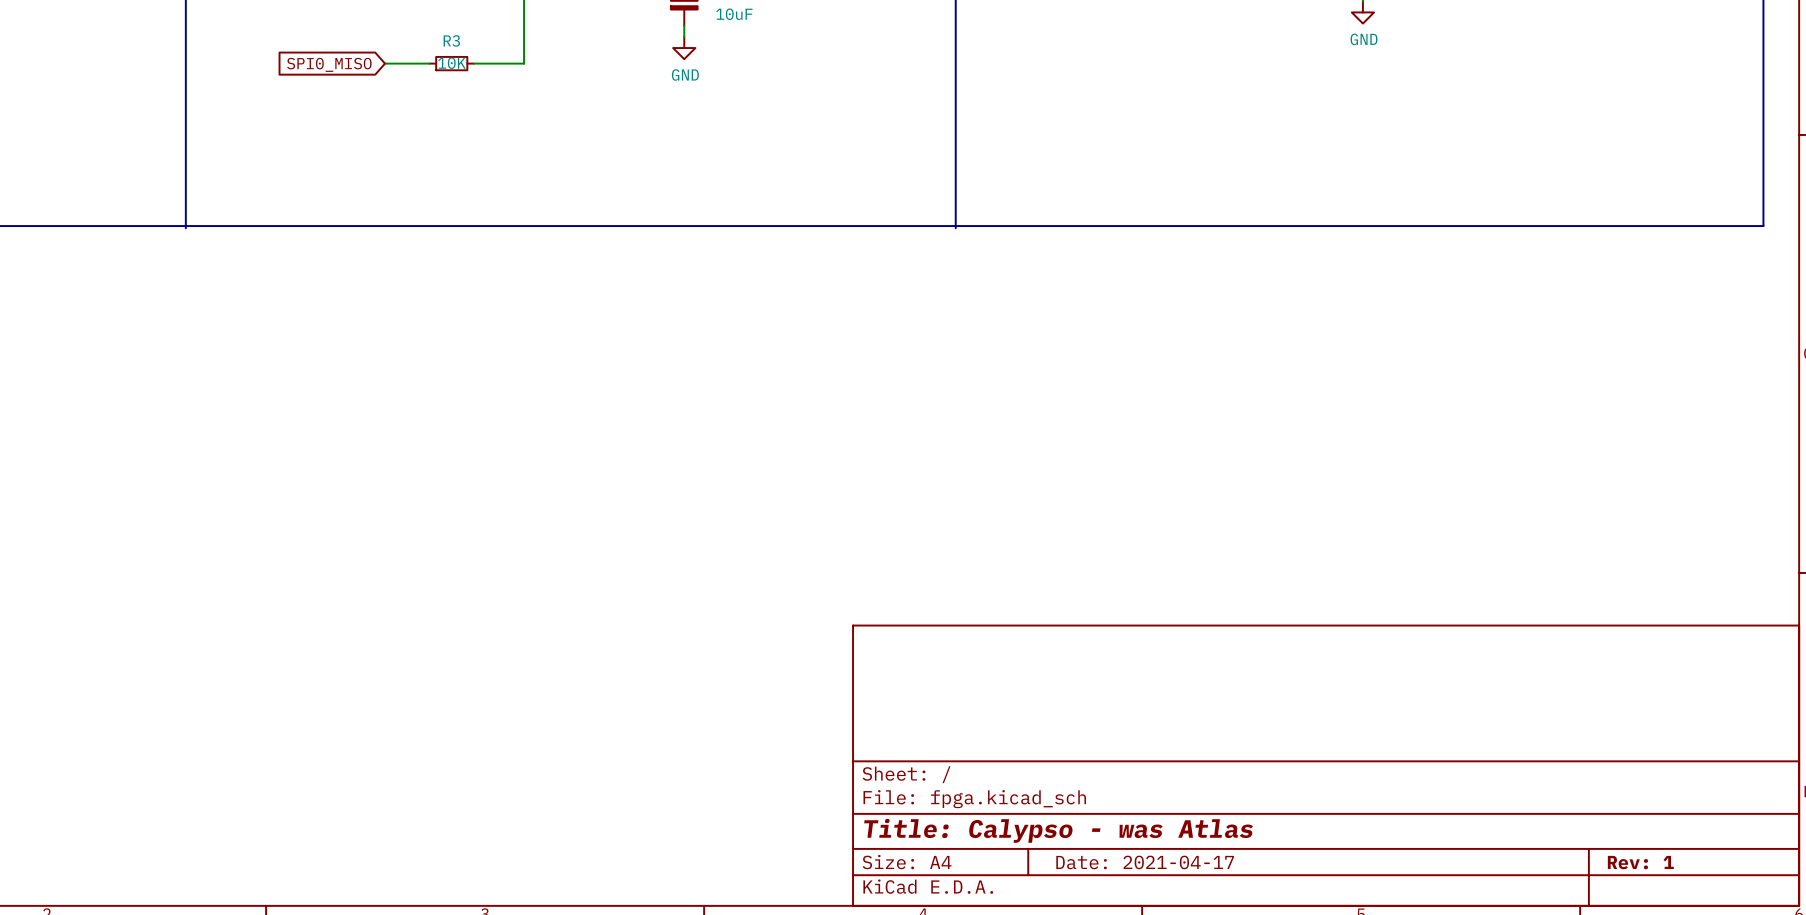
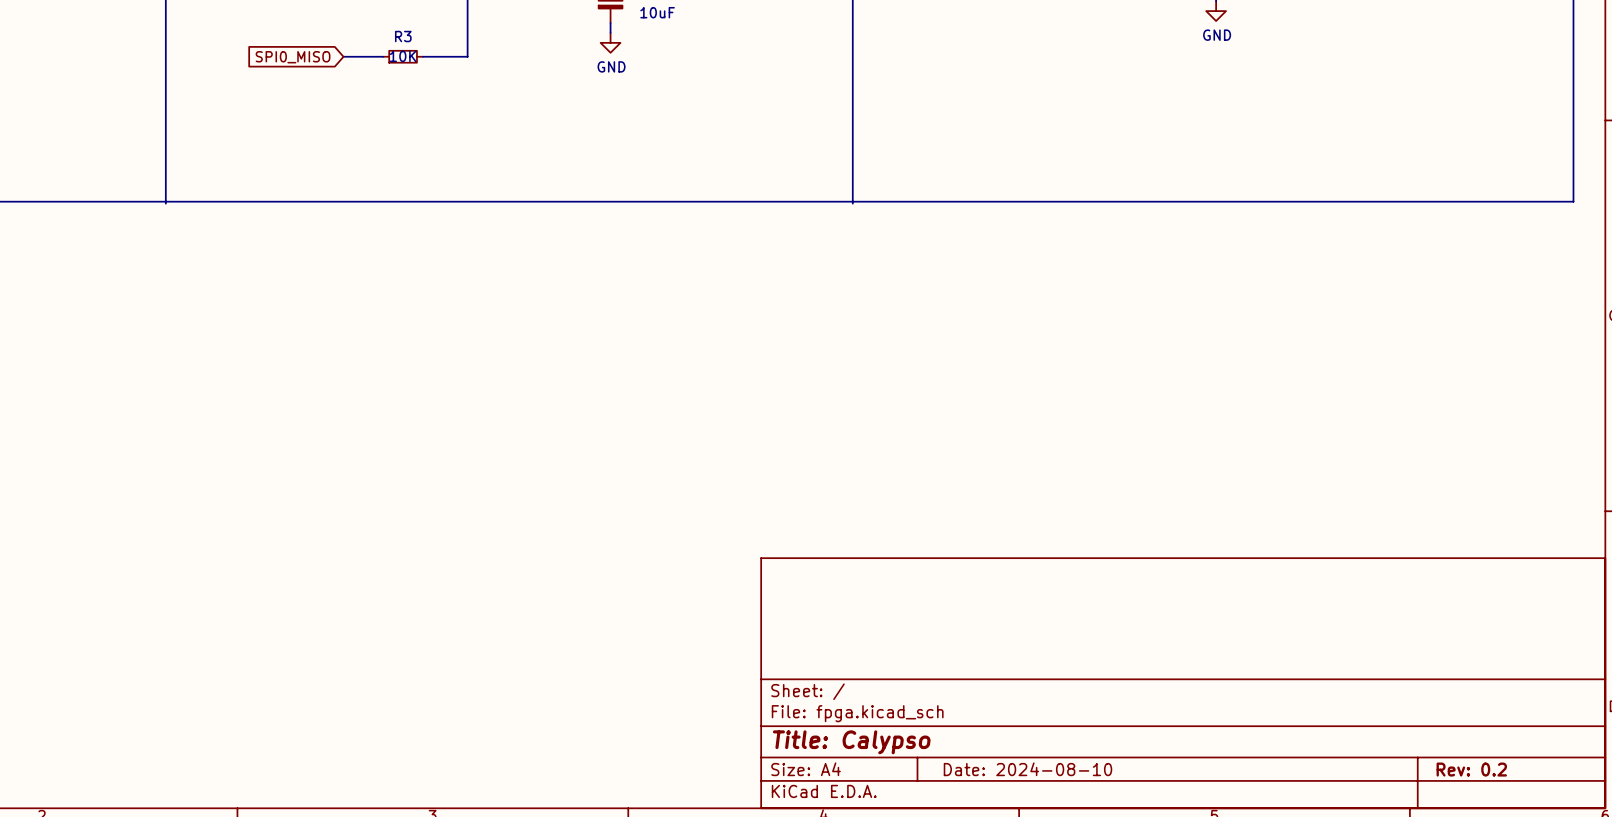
title block: Title: Calypso - was Atlas (1058, 830) -> Title: Calypso (851, 742)
title block: Date: 2021-04-17 (1145, 862) -> Date: 2024-08-10 (1027, 769)
title block: Rev: 1 (1640, 862) -> Rev: 0.2 (1471, 769)

